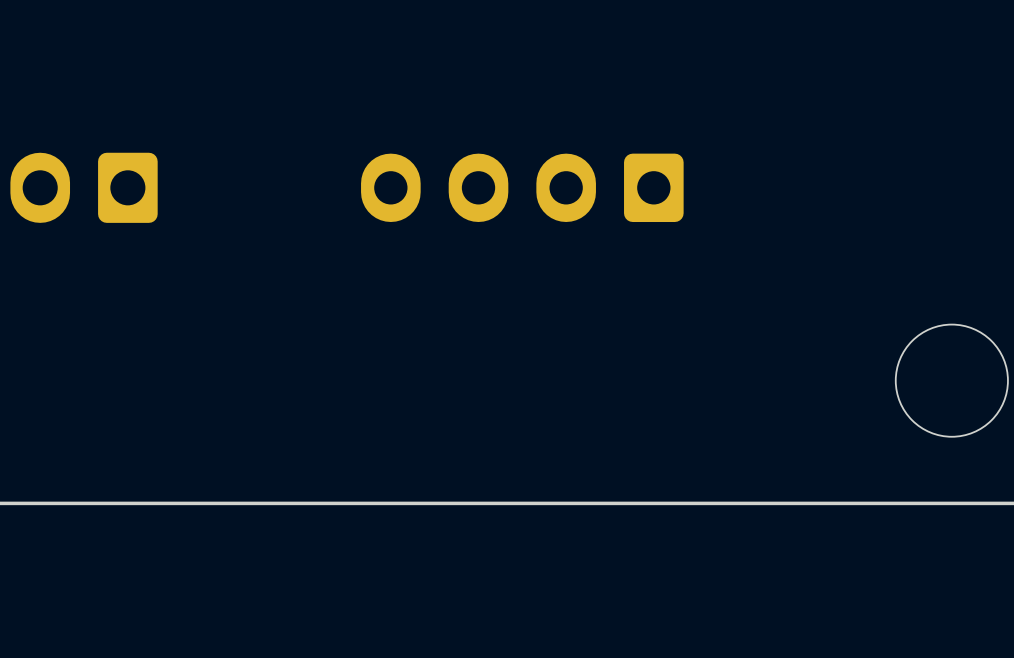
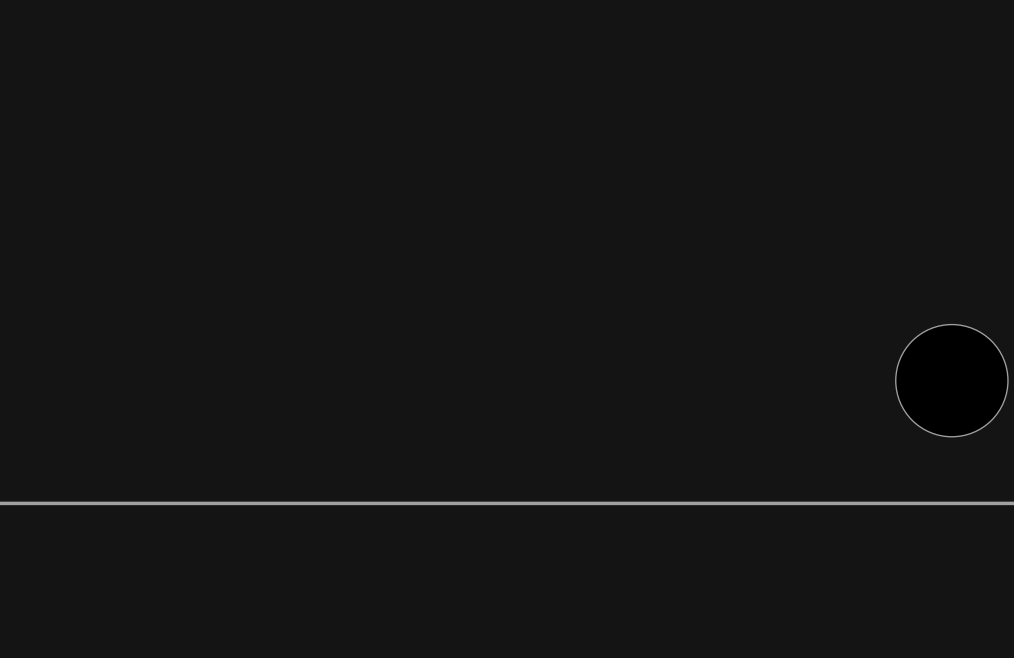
part: (84, 187) -> none
part: (522, 187) -> none

